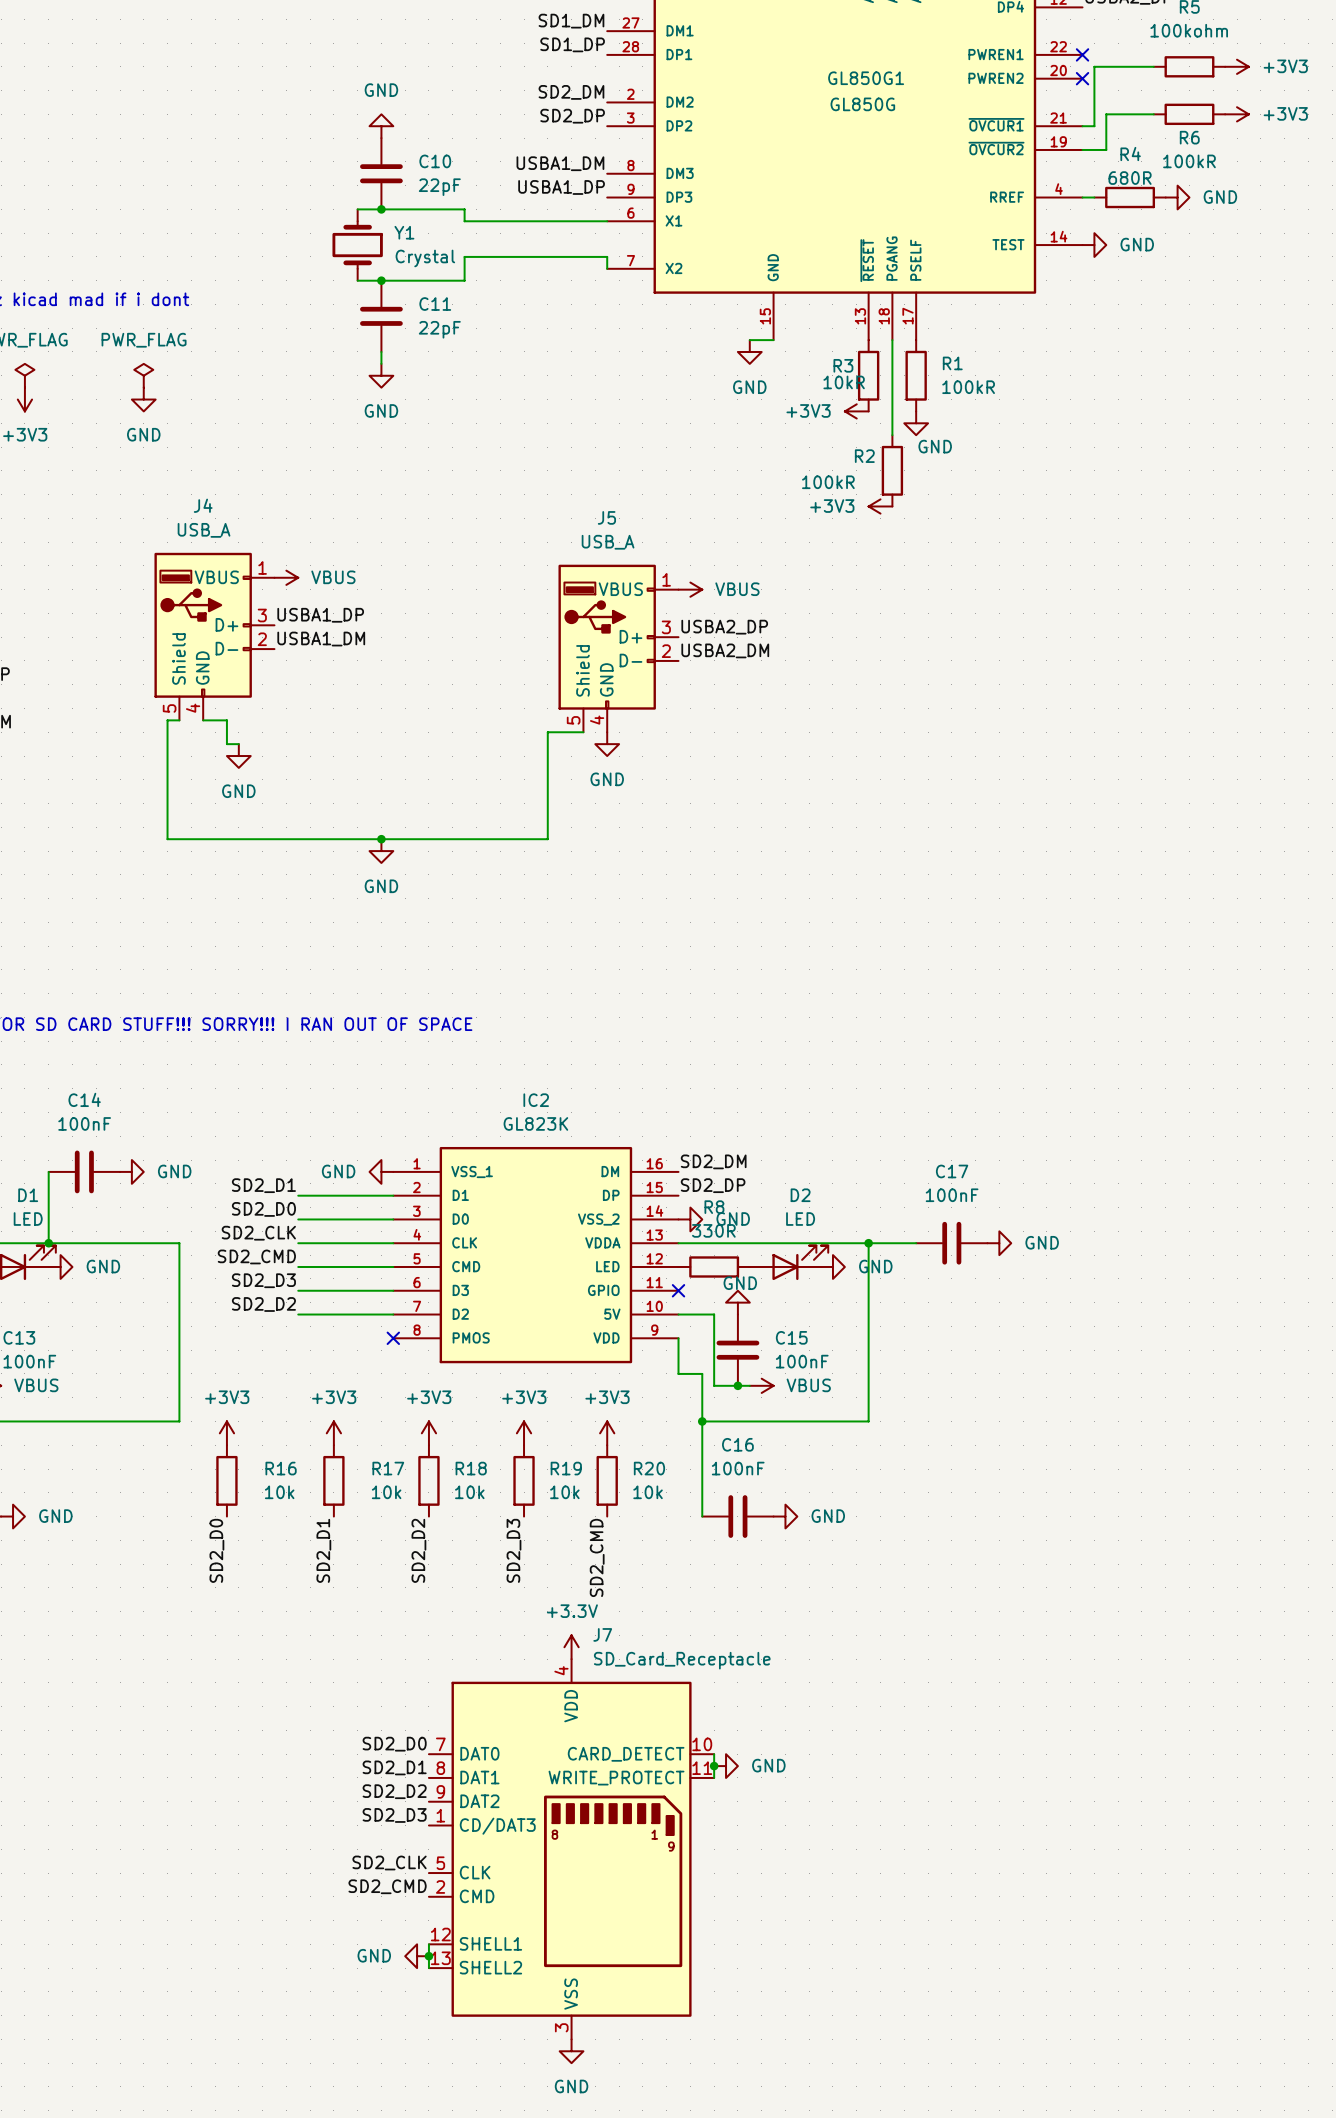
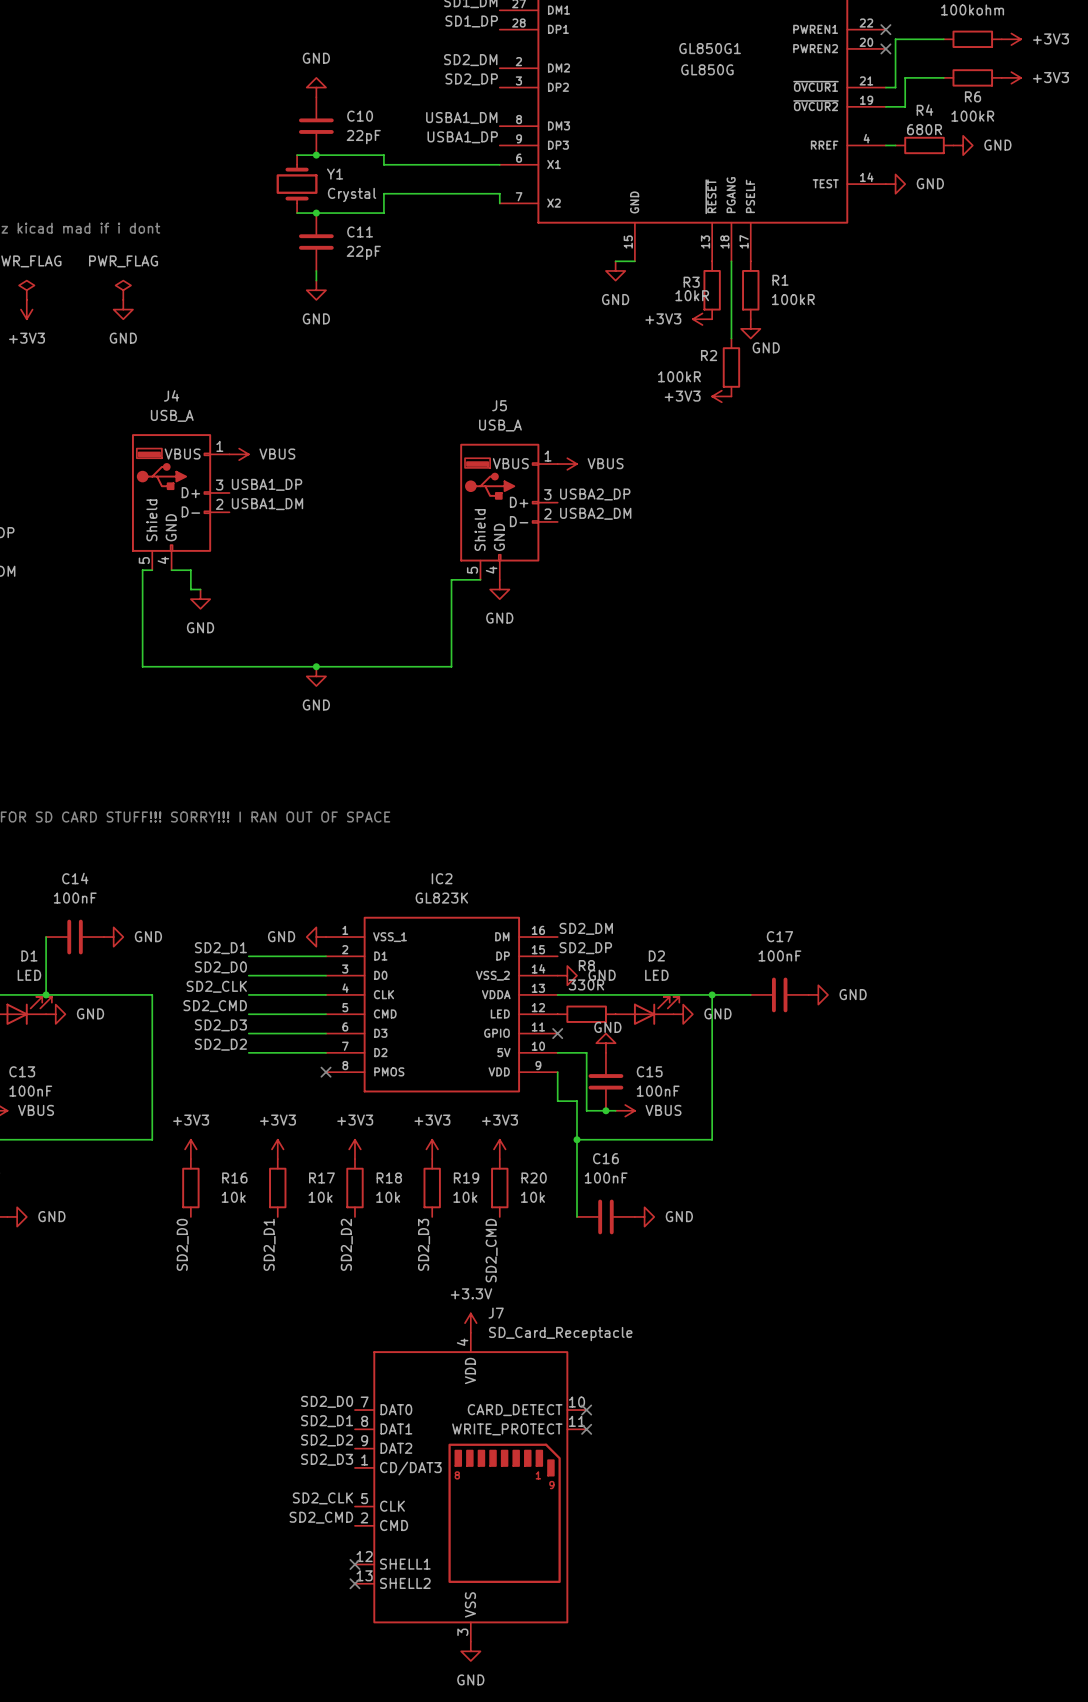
wire: (714, 1754) (714, 1777) -> none
no-connect mark: none -> (586, 1410)
junction: (714, 1766) -> none
power symbol: GND (726, 1766) -> none
no-connect mark: none -> (586, 1429)
wire: (428, 1944) (428, 1968) -> none
no-connect mark: none -> (354, 1564)
power symbol: GND (417, 1956) -> none
junction: (428, 1956) -> none
no-connect mark: none -> (354, 1583)

